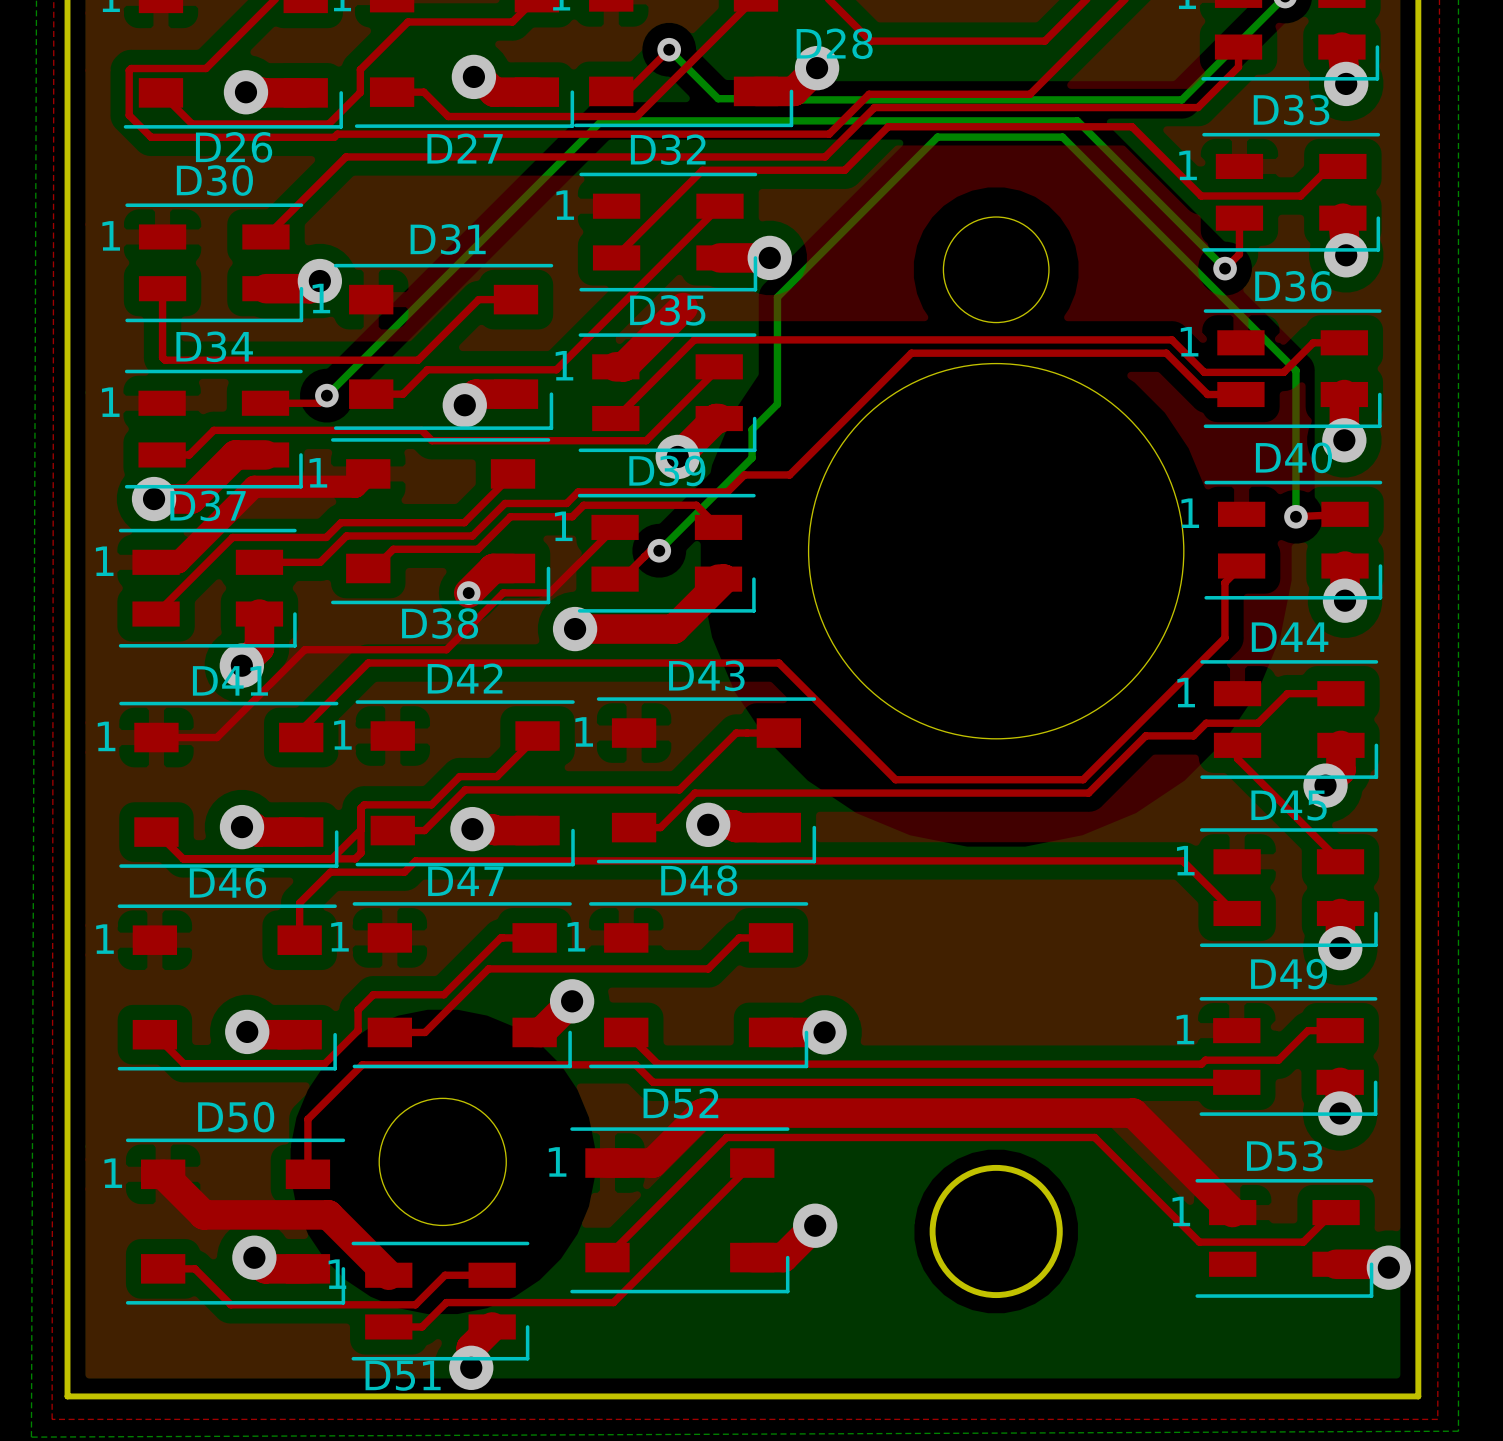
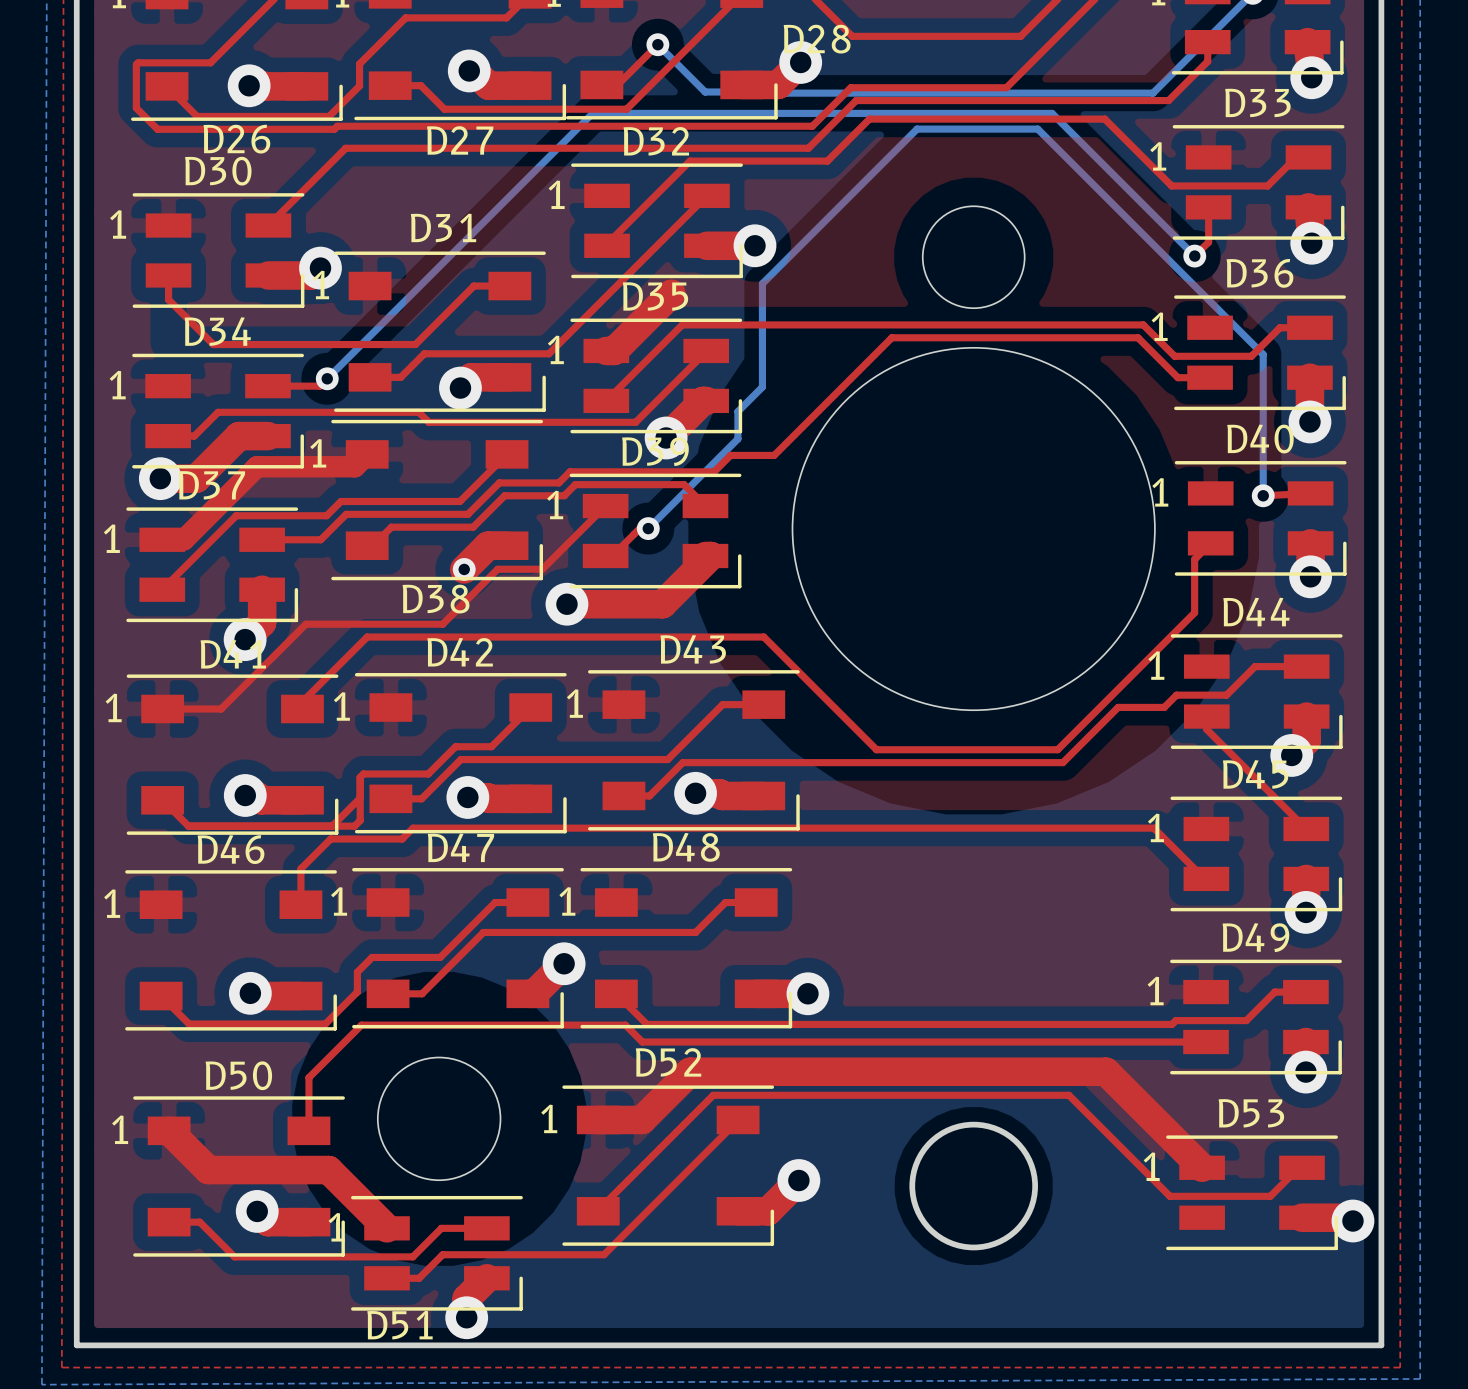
top track: (162, 313) (162, 357) (165, 360) (209, 360) -> (168, 299) (213, 344)

